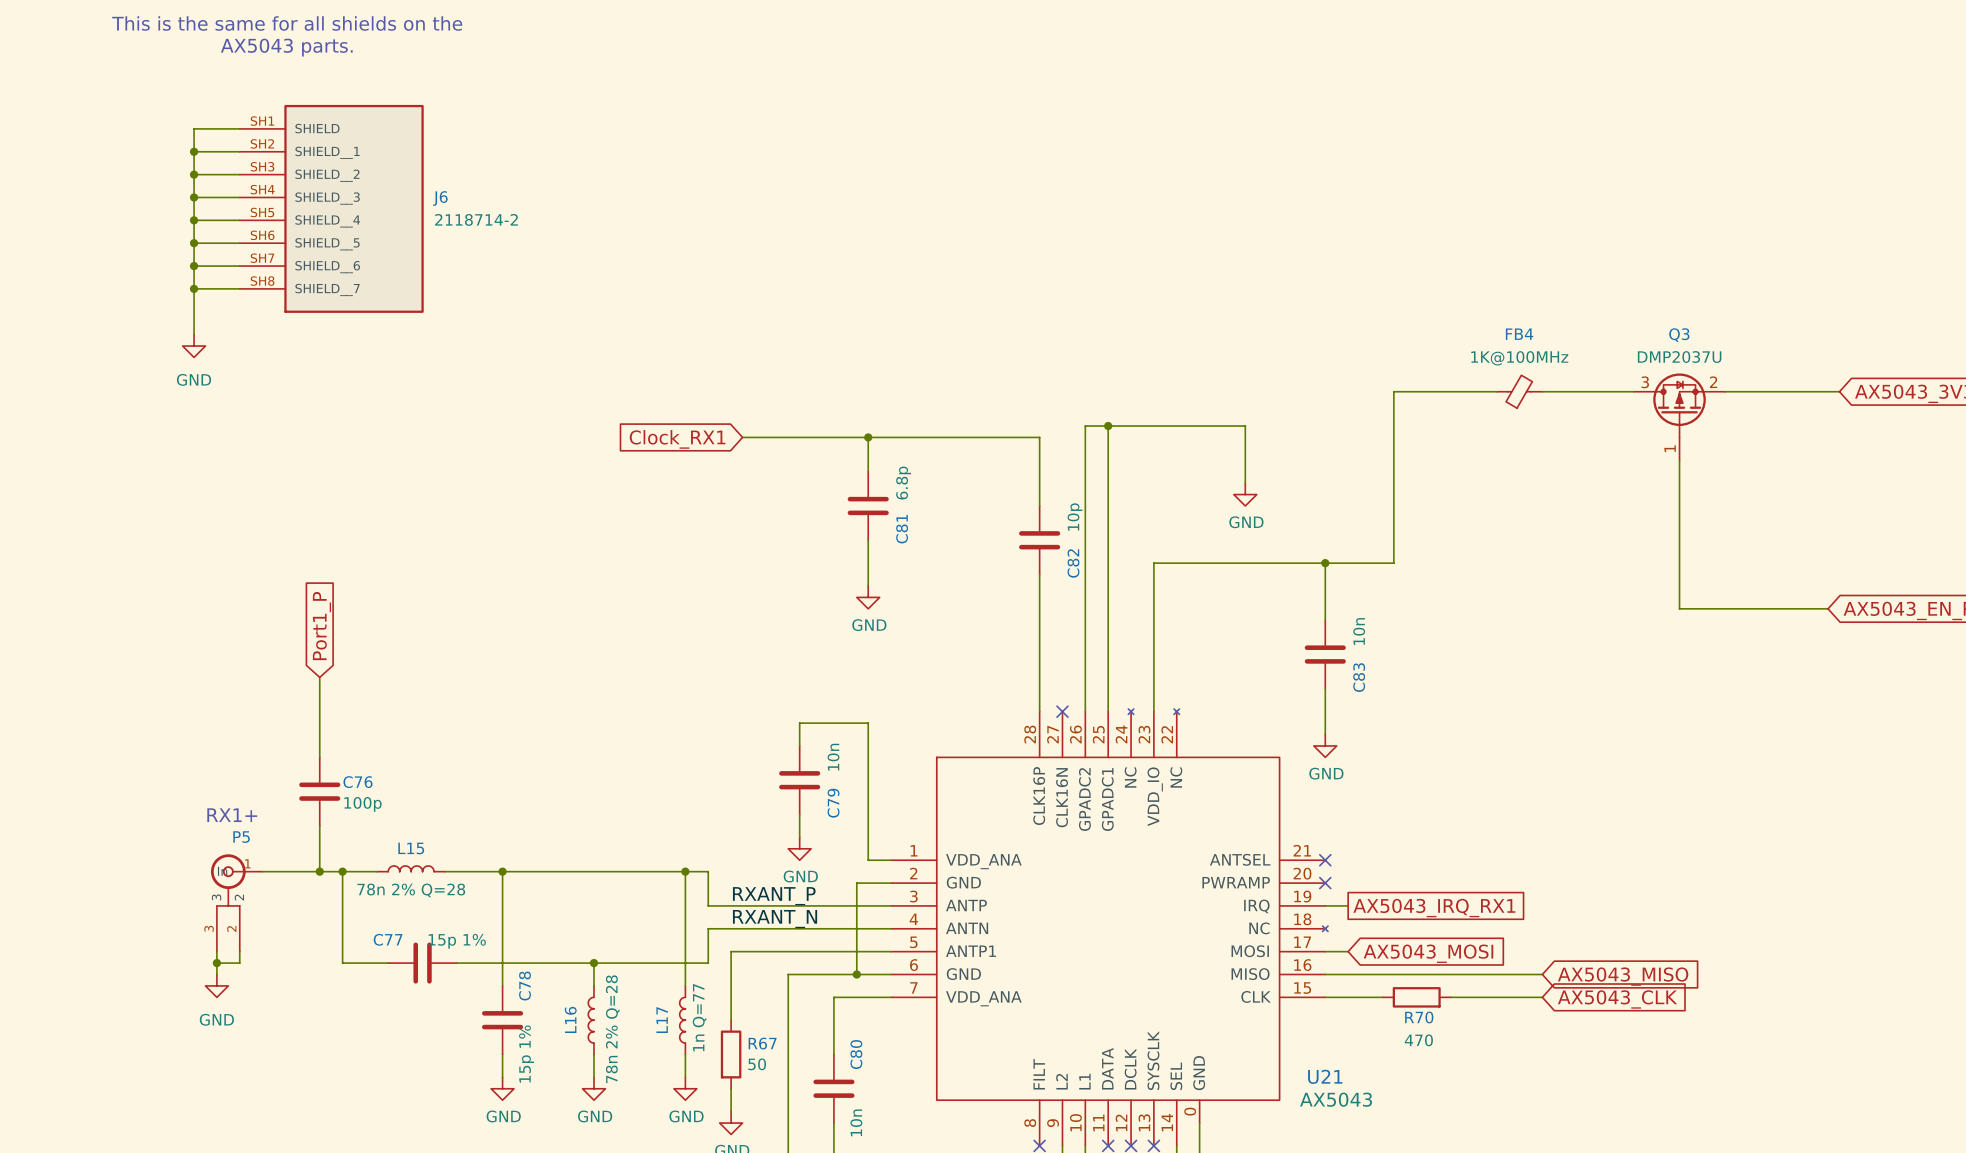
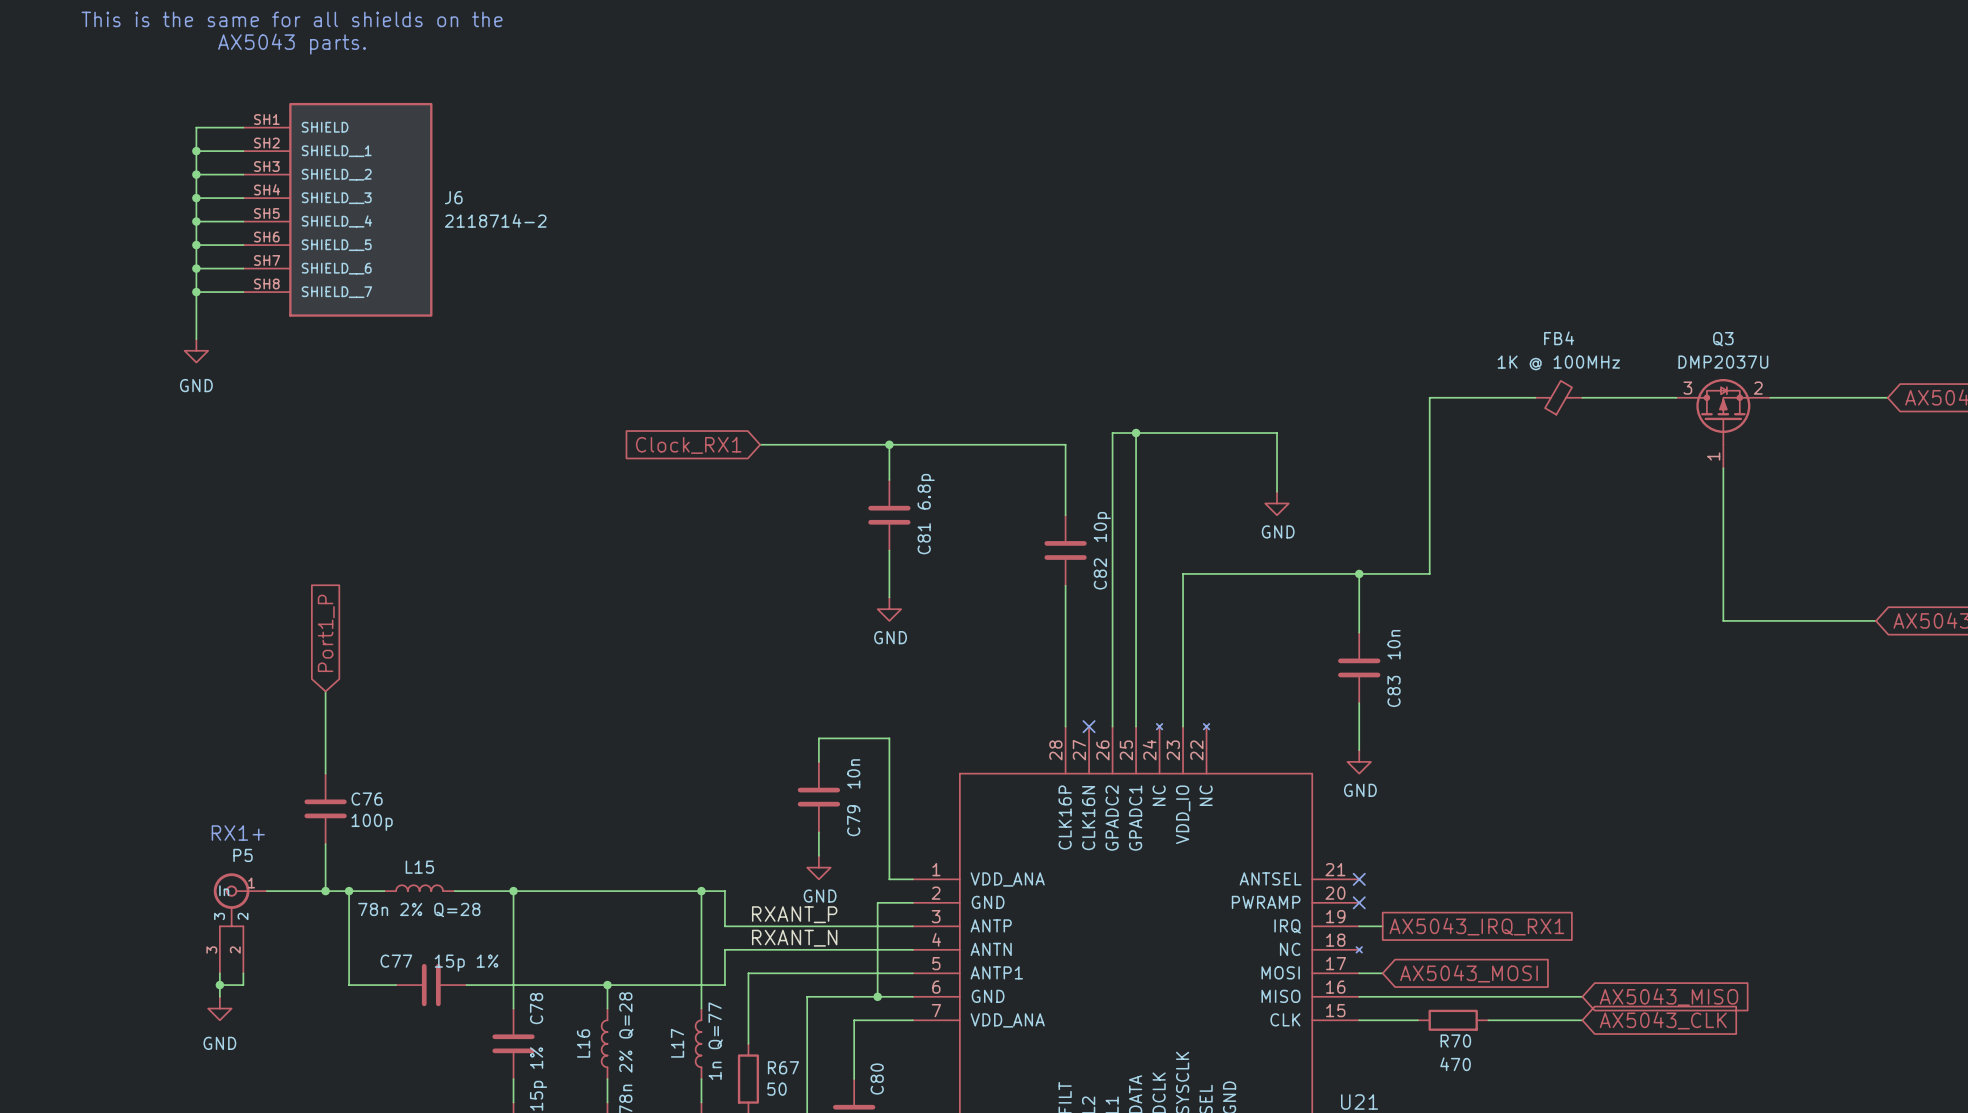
FB4 value: 1K@100MHz (1519, 358) -> 1K @ 100MHz (1558, 362)

